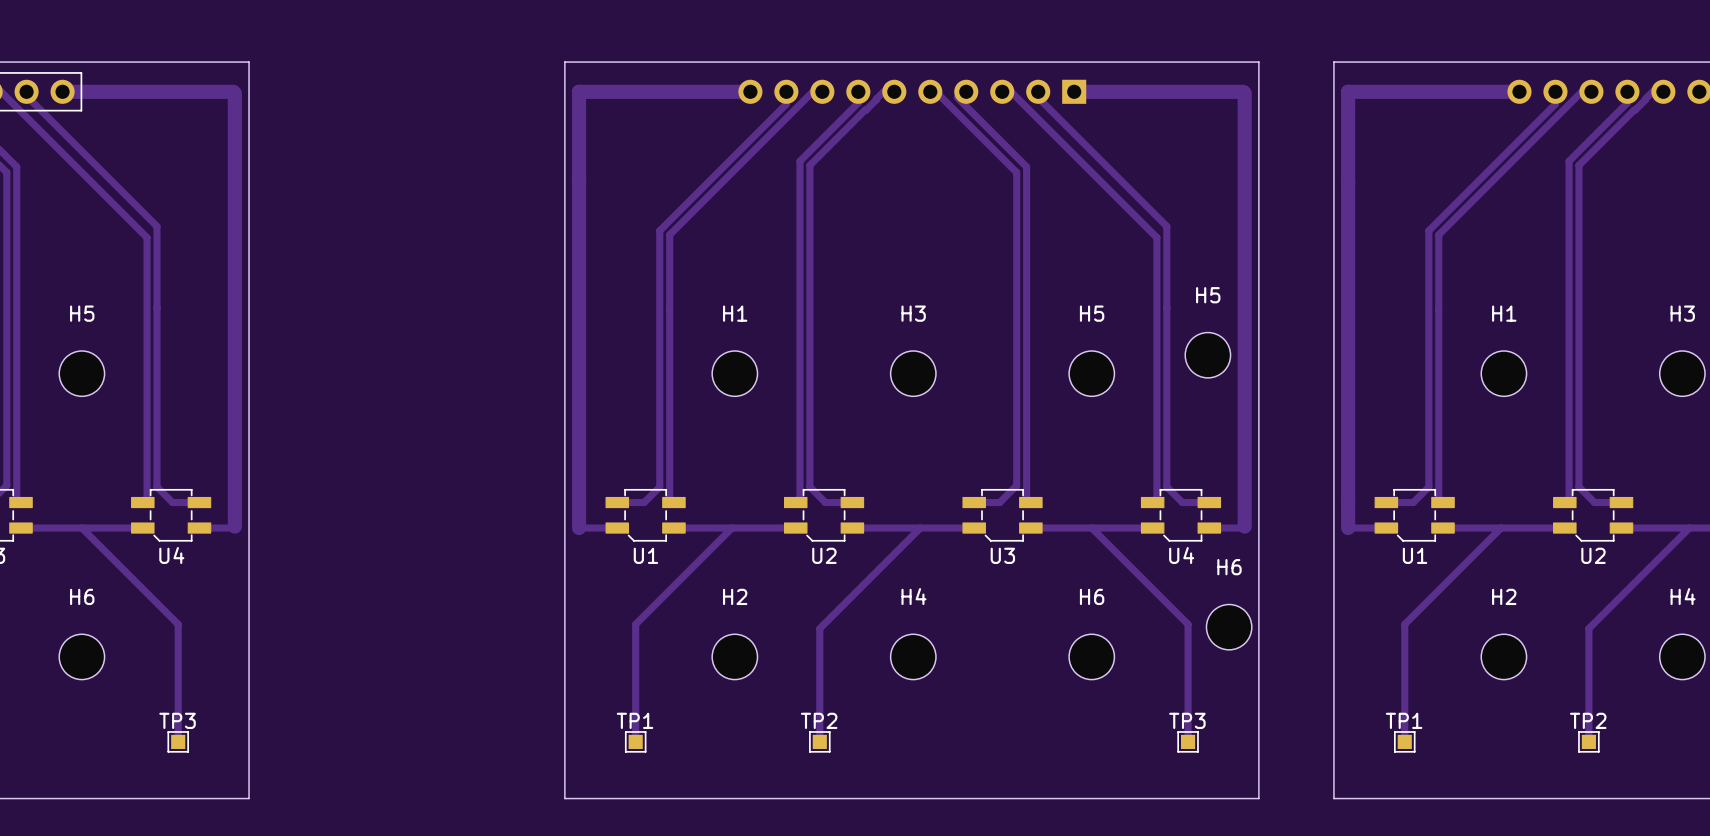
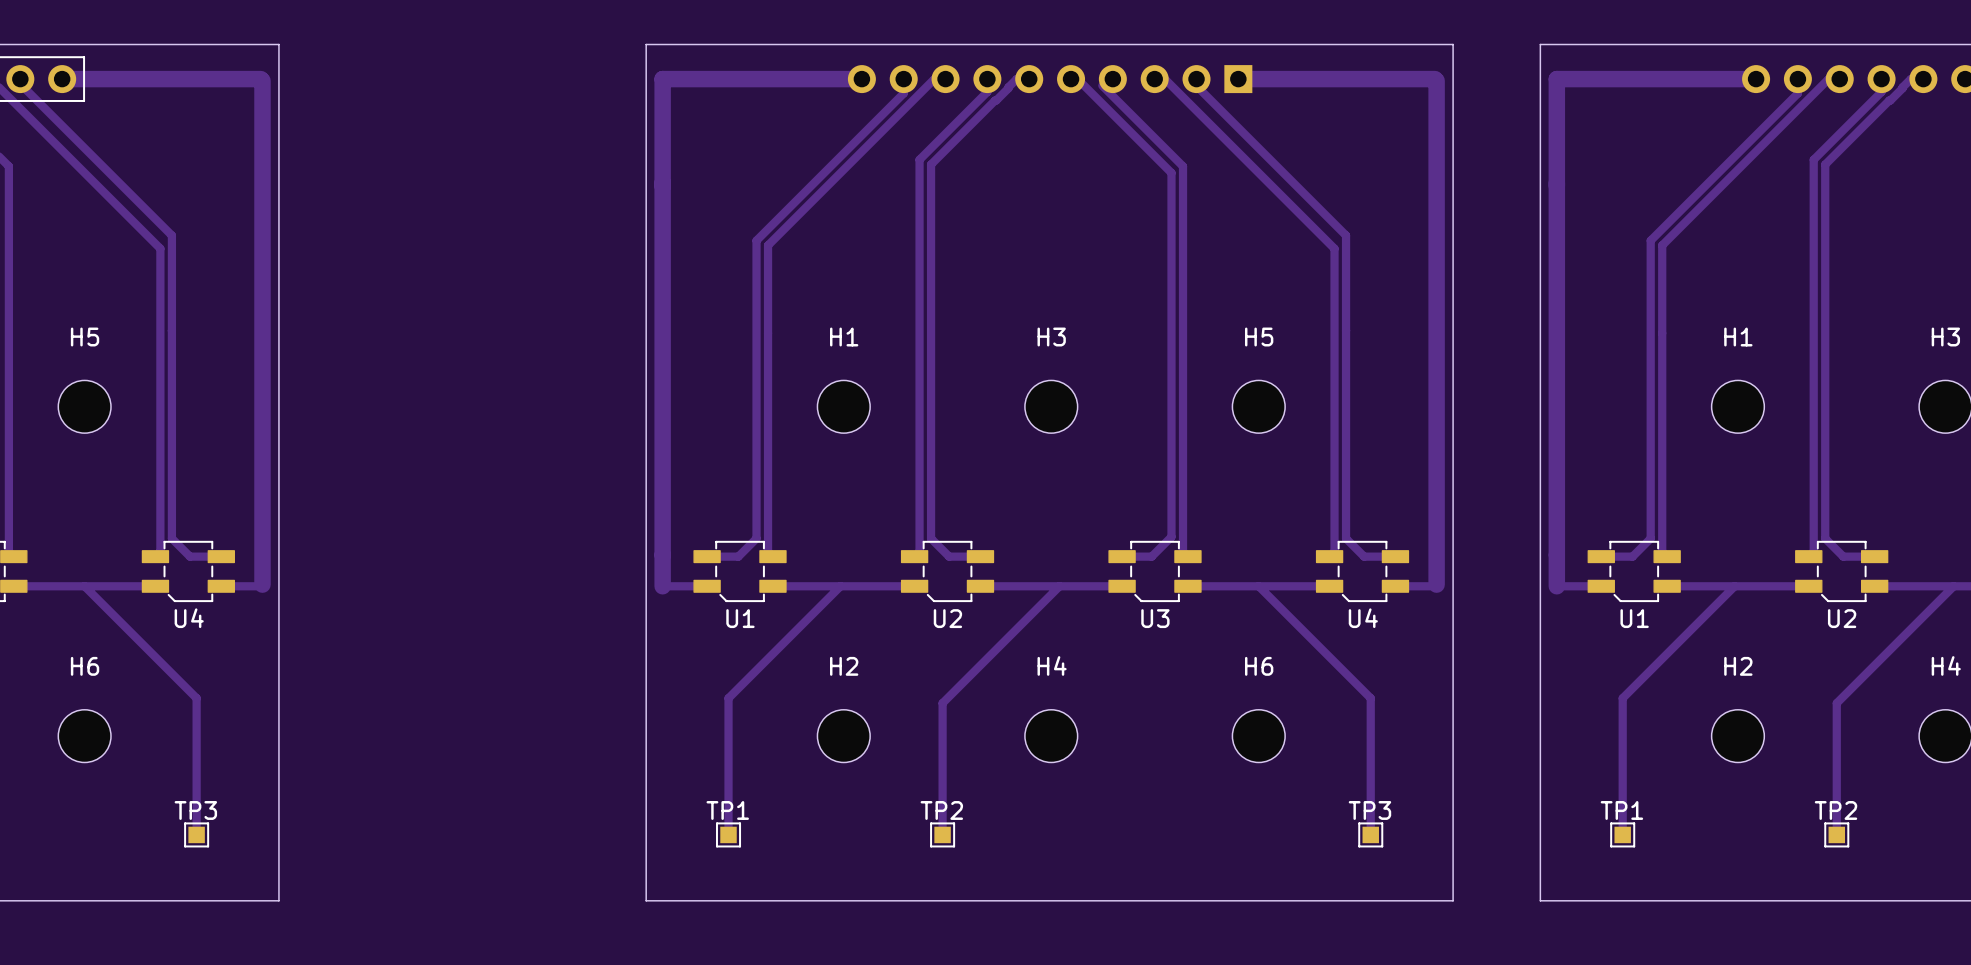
H5: (1207, 355) -> none
H6: (1229, 627) -> none

